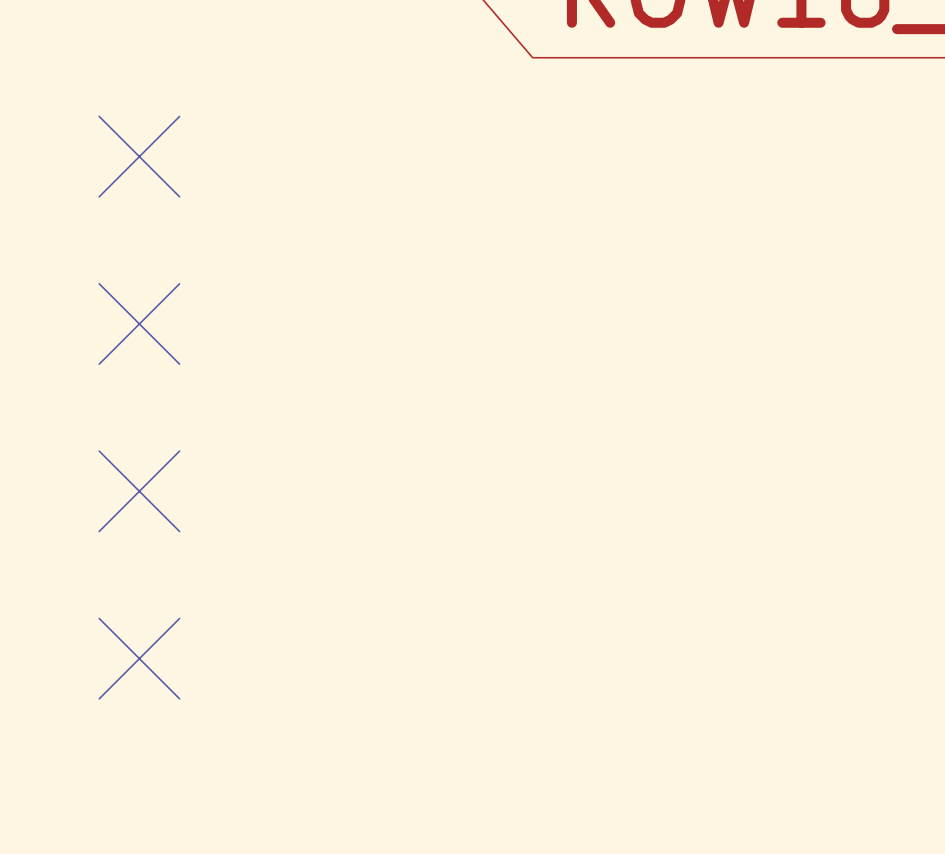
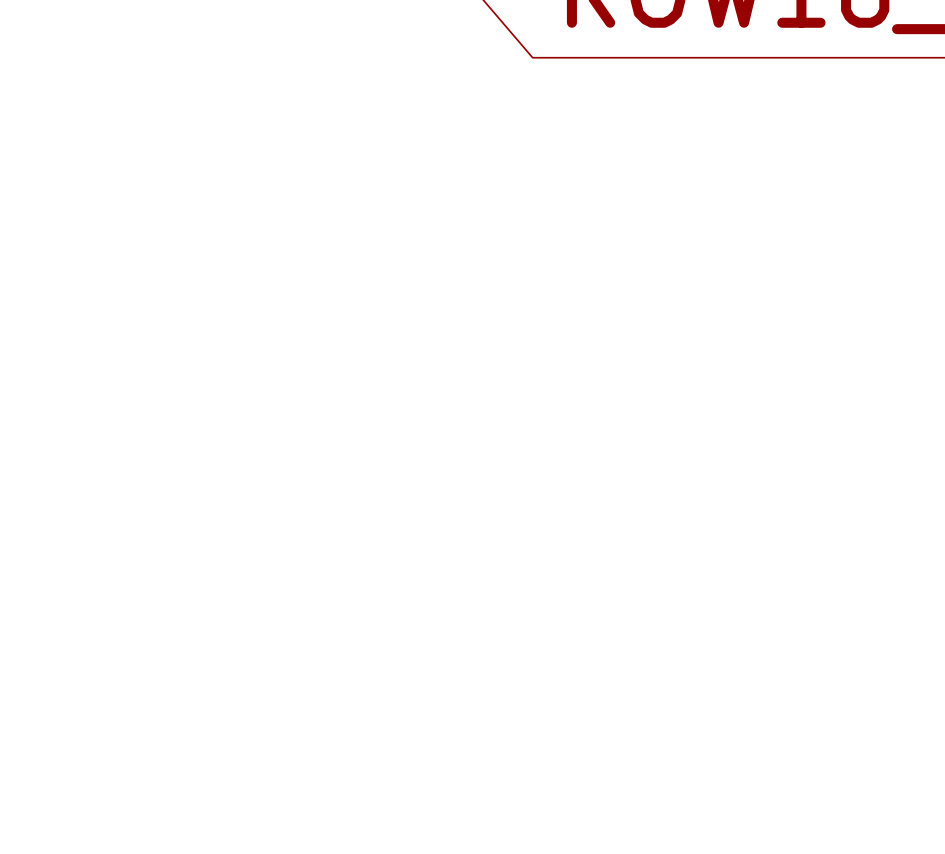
no-connect mark: (139, 156) -> none
no-connect mark: (139, 323) -> none
no-connect mark: (139, 491) -> none
no-connect mark: (139, 658) -> none

